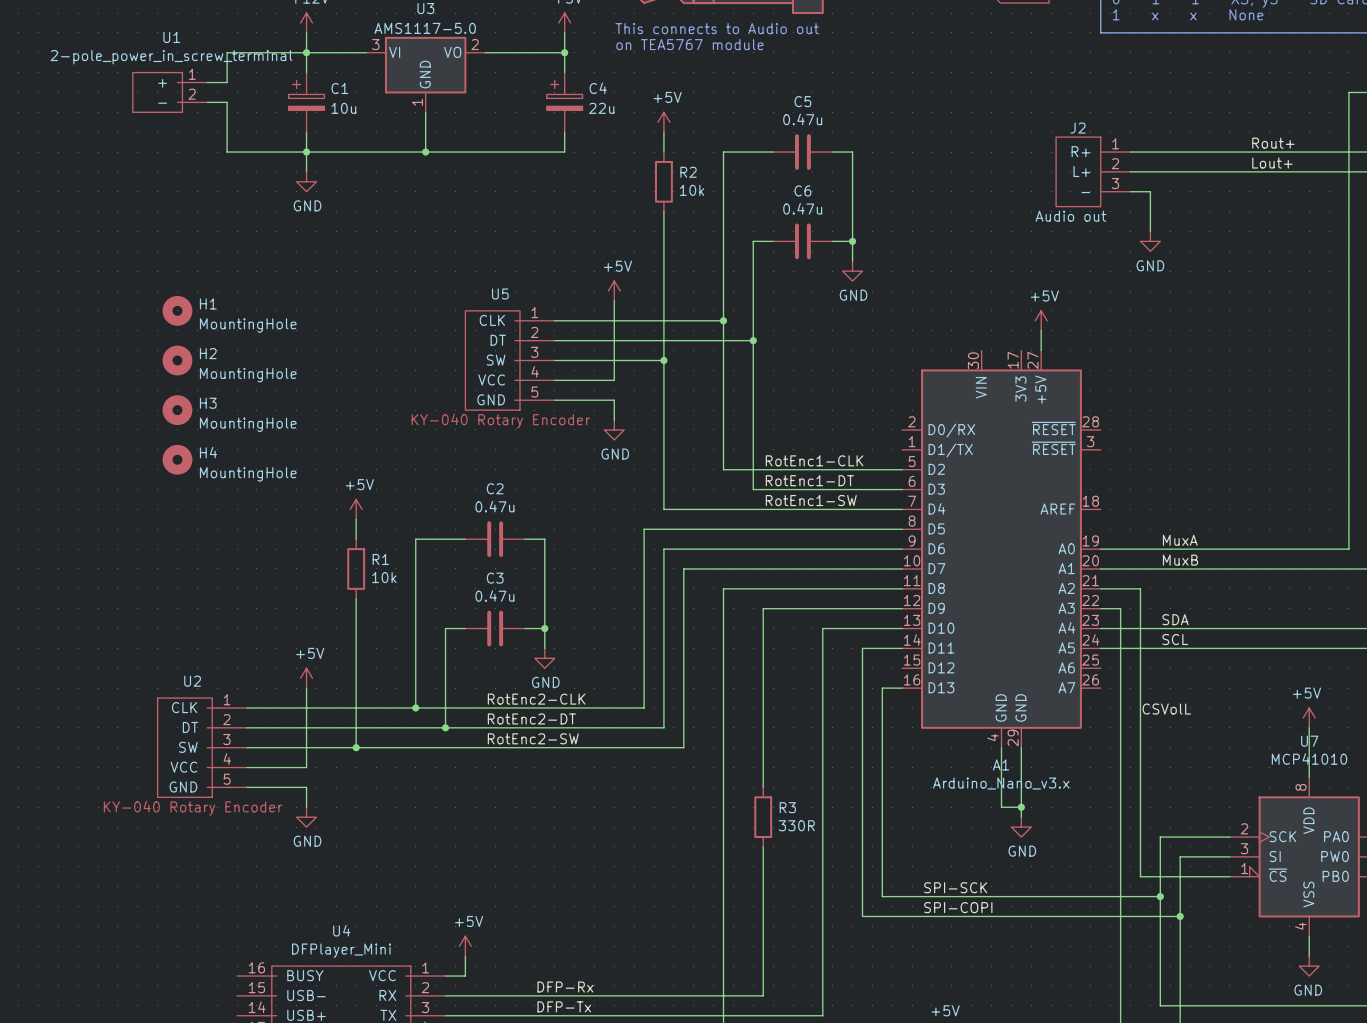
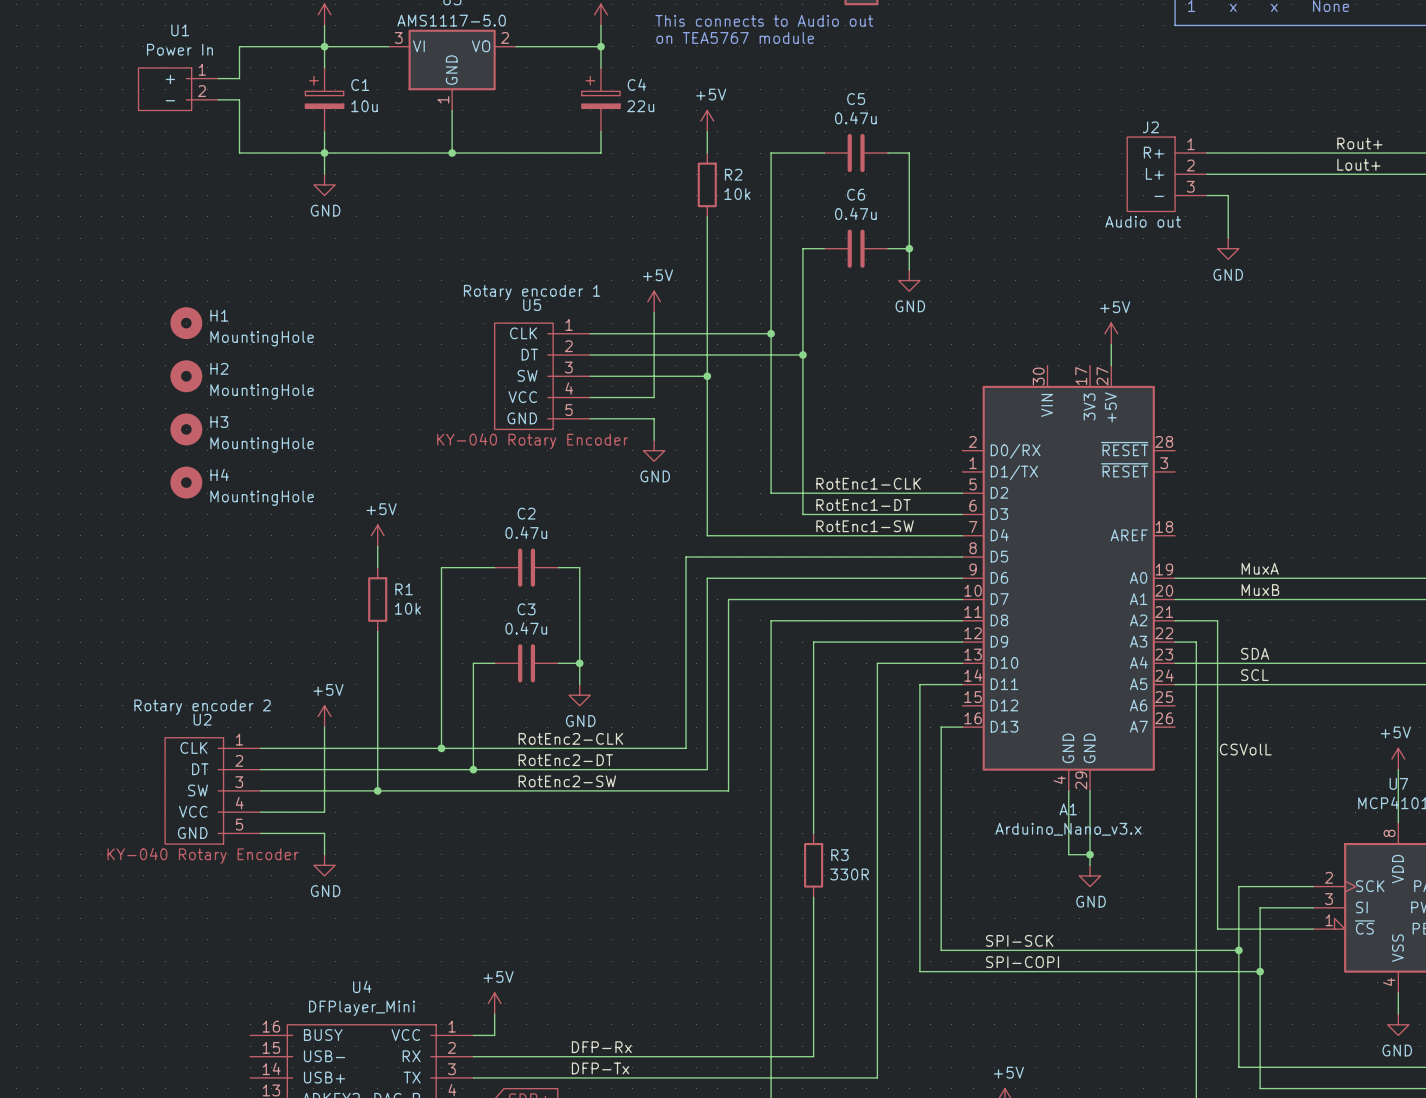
U1 value: 2-pole_power_in_screw_terminal (171, 57) -> Power In (179, 49)
U5 value: none -> Rotary encoder 1 (532, 292)
U2 value: none -> Rotary encoder 2 (202, 707)

